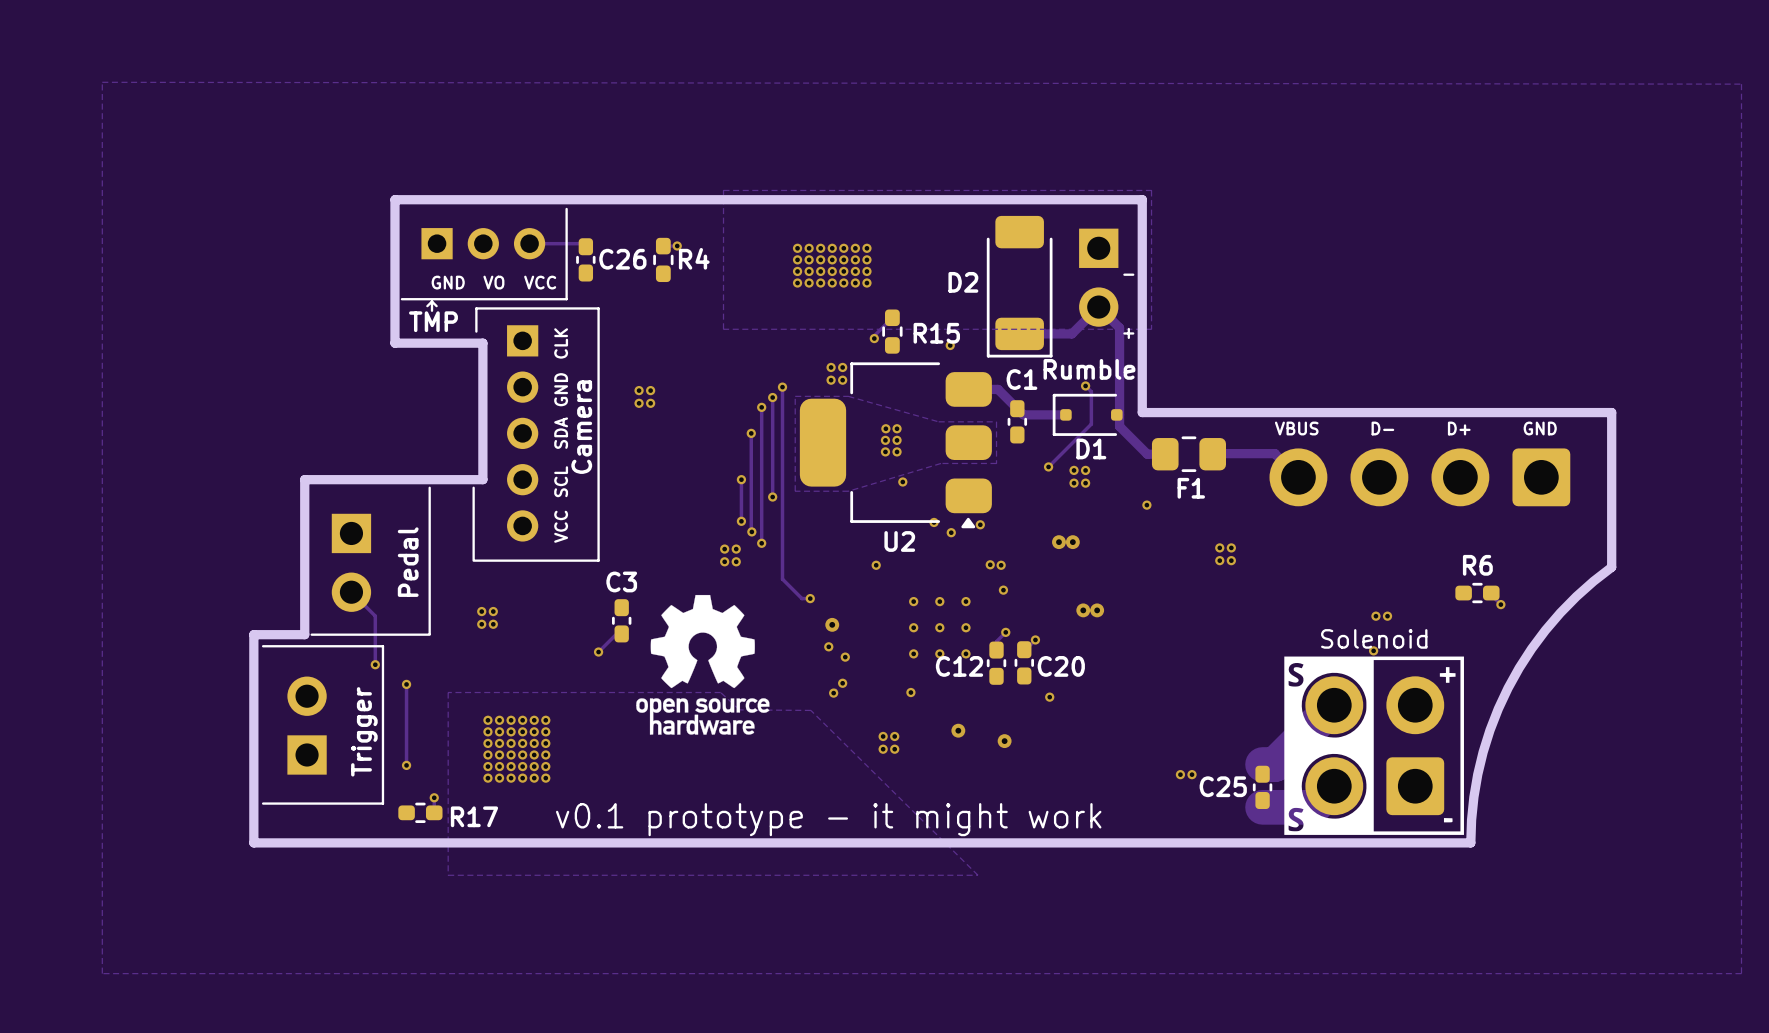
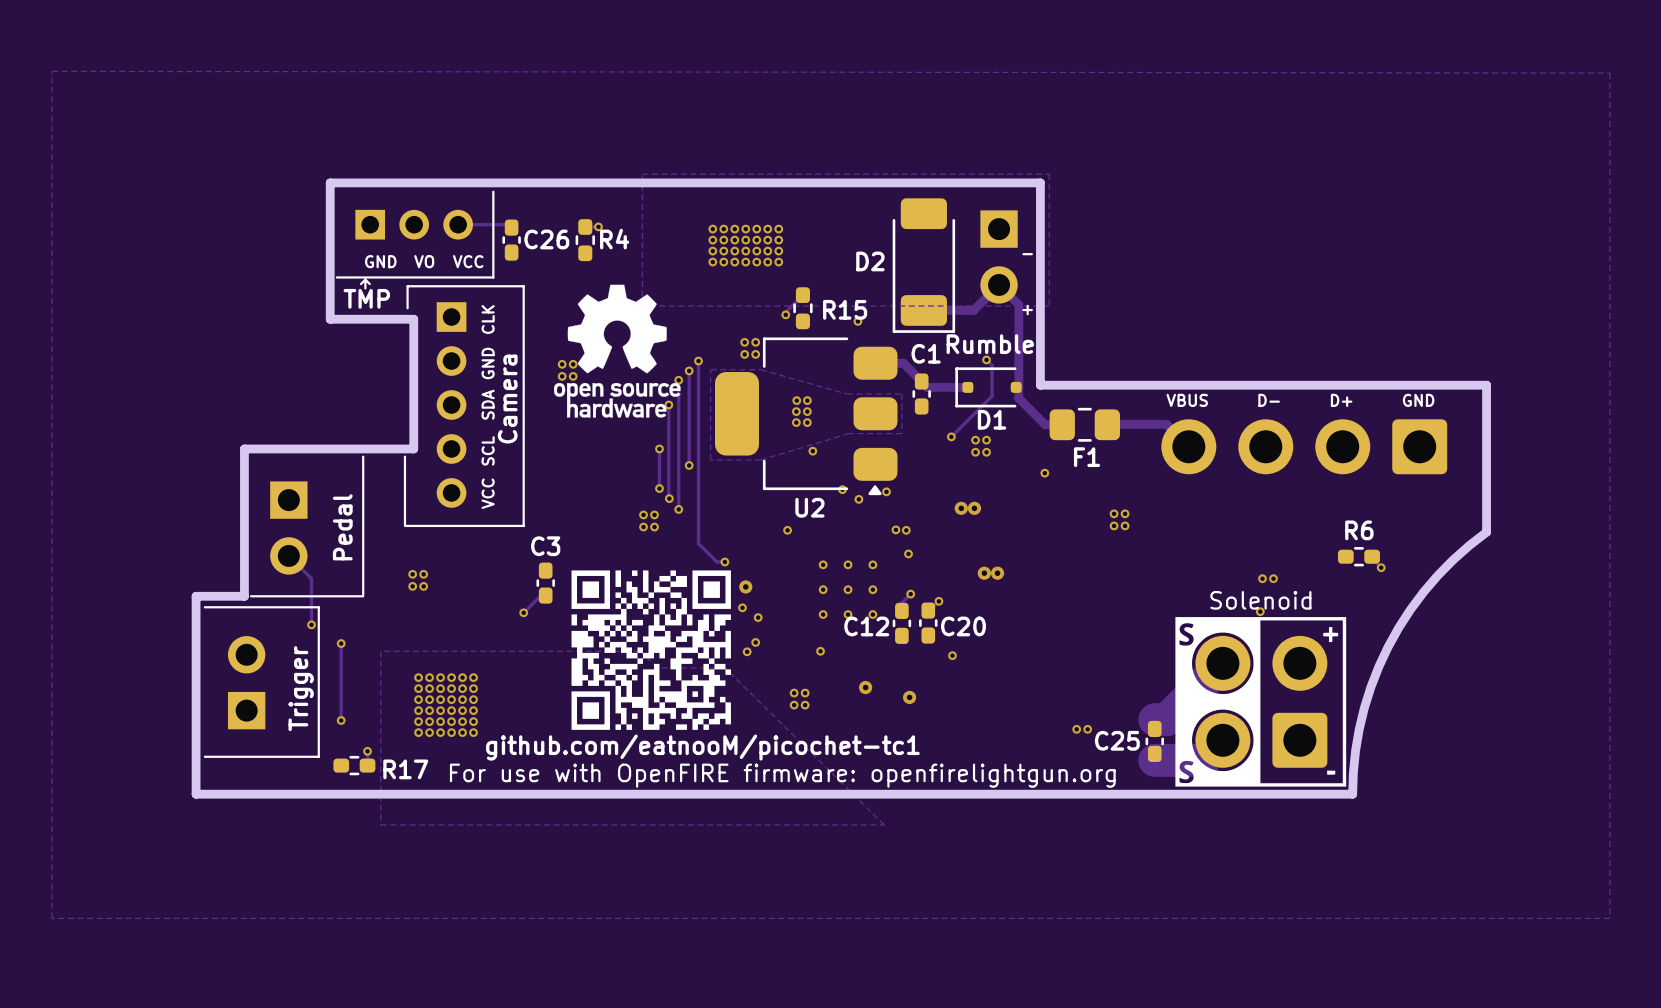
drawing: none -> [571, 570, 731, 730]
drawing position: (702, 664) -> (617, 351)
text: v0.1 prototype - it might work (828, 819) -> none
text: none -> For use with OpenFIRE firmware: openfirelightgun.org (782, 775)

